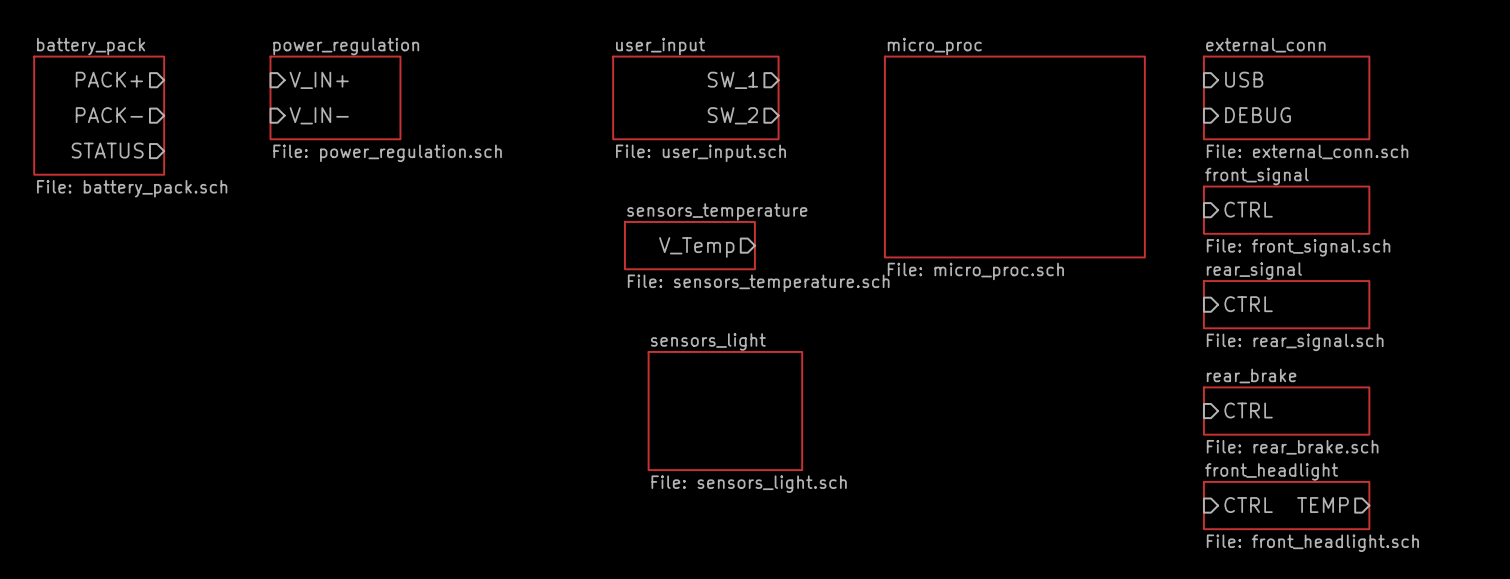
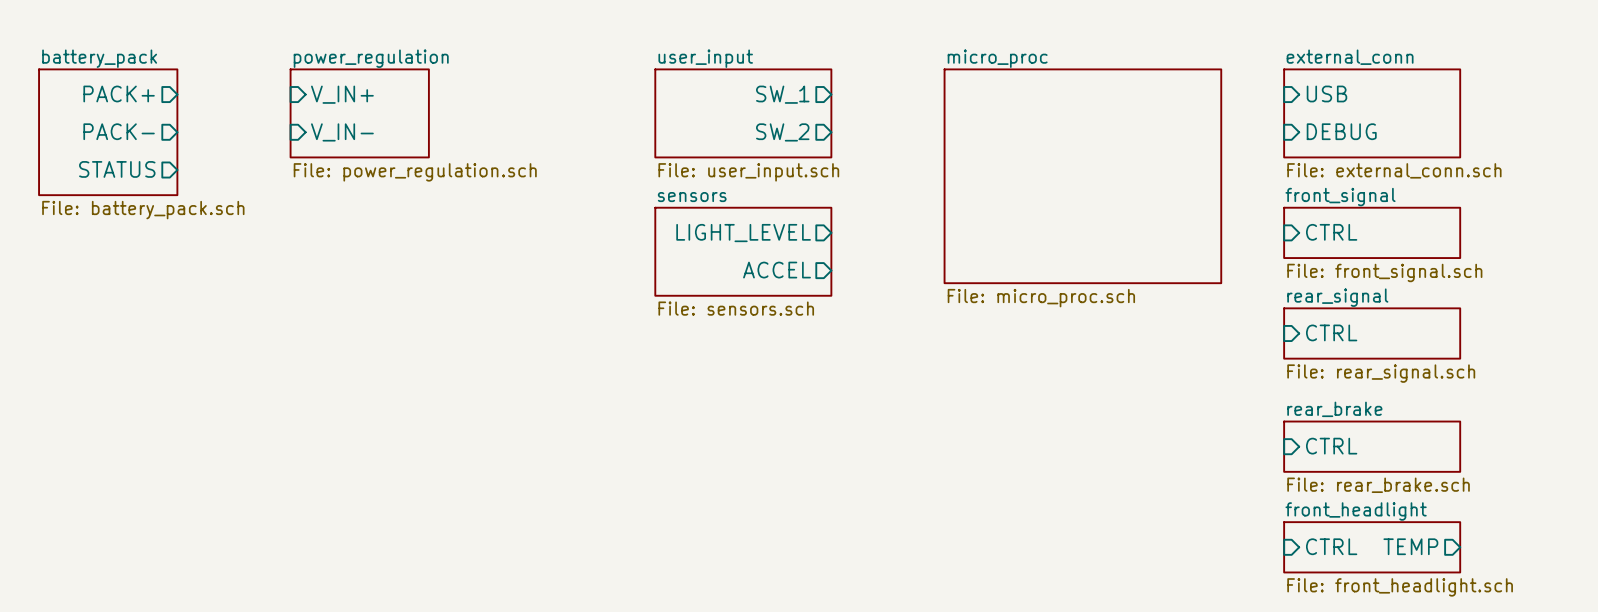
sheet pin: none -> LIGHT_LEVEL (743, 233)
sheet sensors: none -> File: sensors.sch (743, 251)
sheet sensors_temperature: File: sensors_temperature.sch (689, 245) -> none
sheet pin: none -> ACCEL (777, 270)
sheet pin: V_Temp (696, 247) -> none
sheet sensors_light: File: sensors_light.sch (725, 411) -> none

